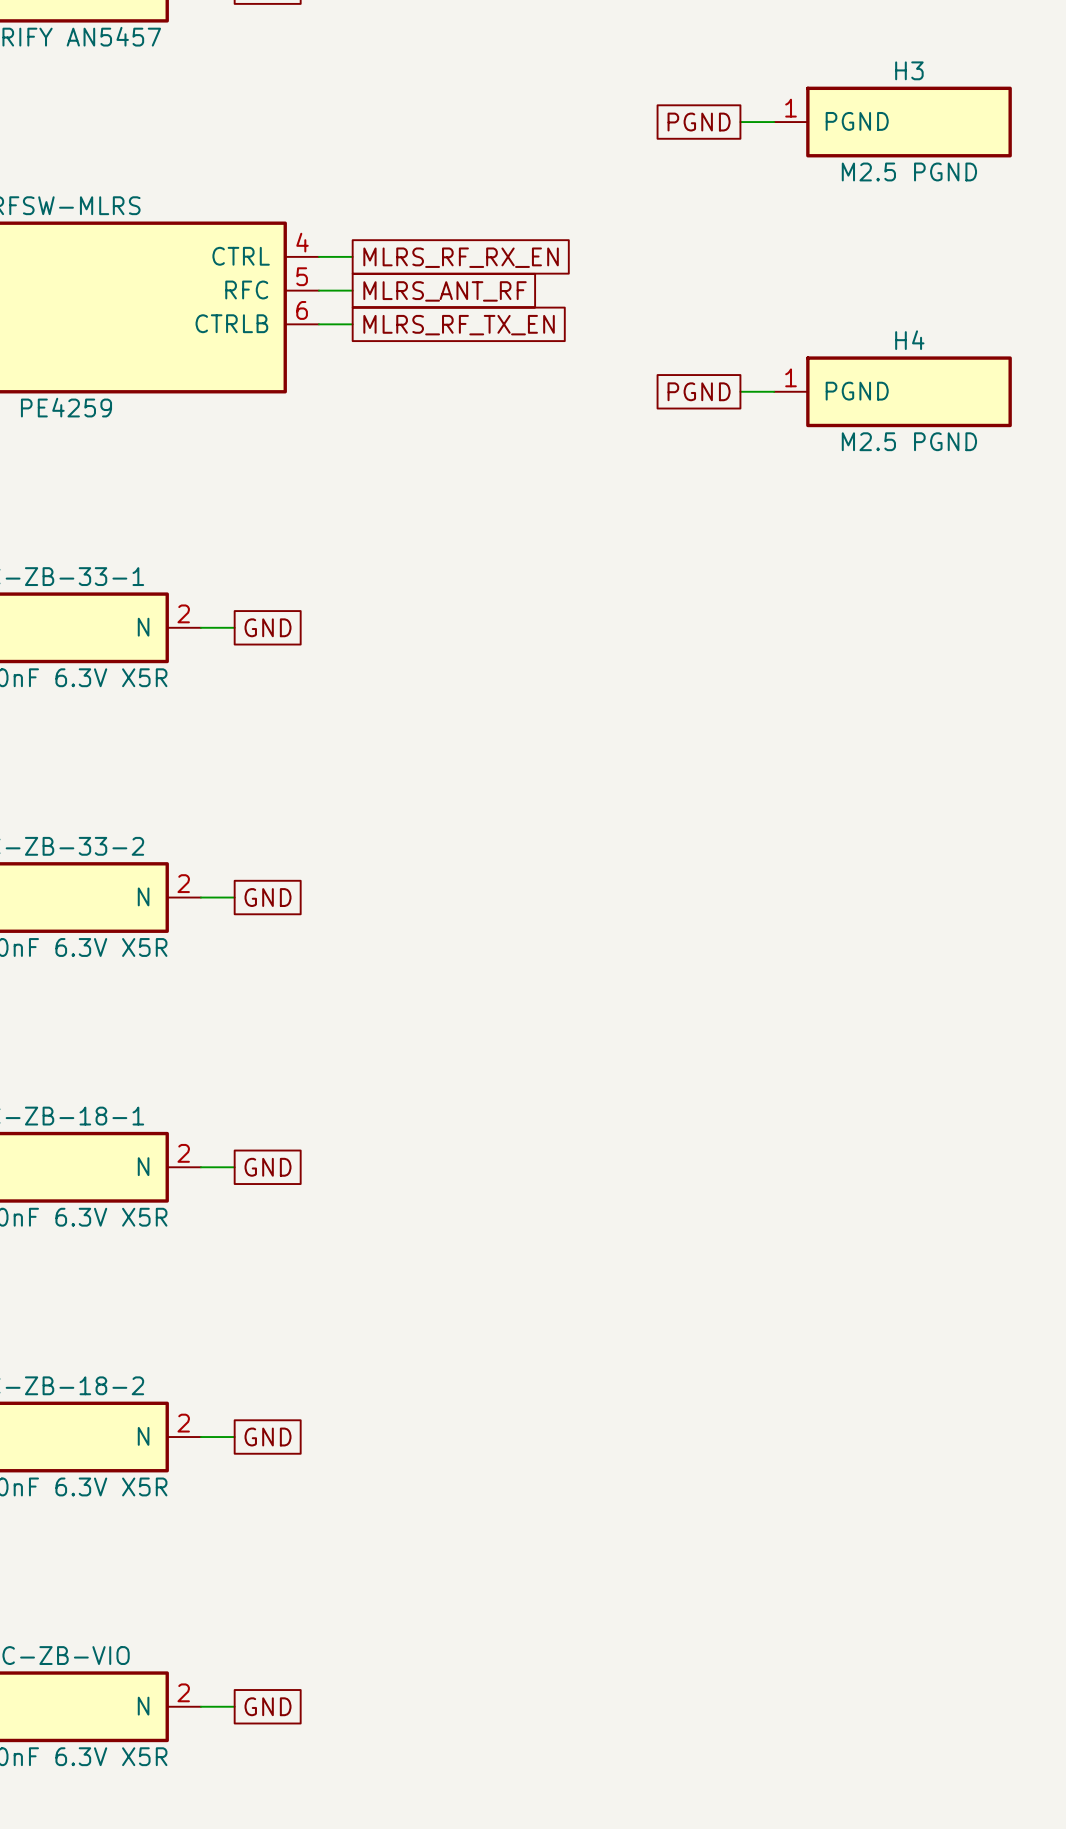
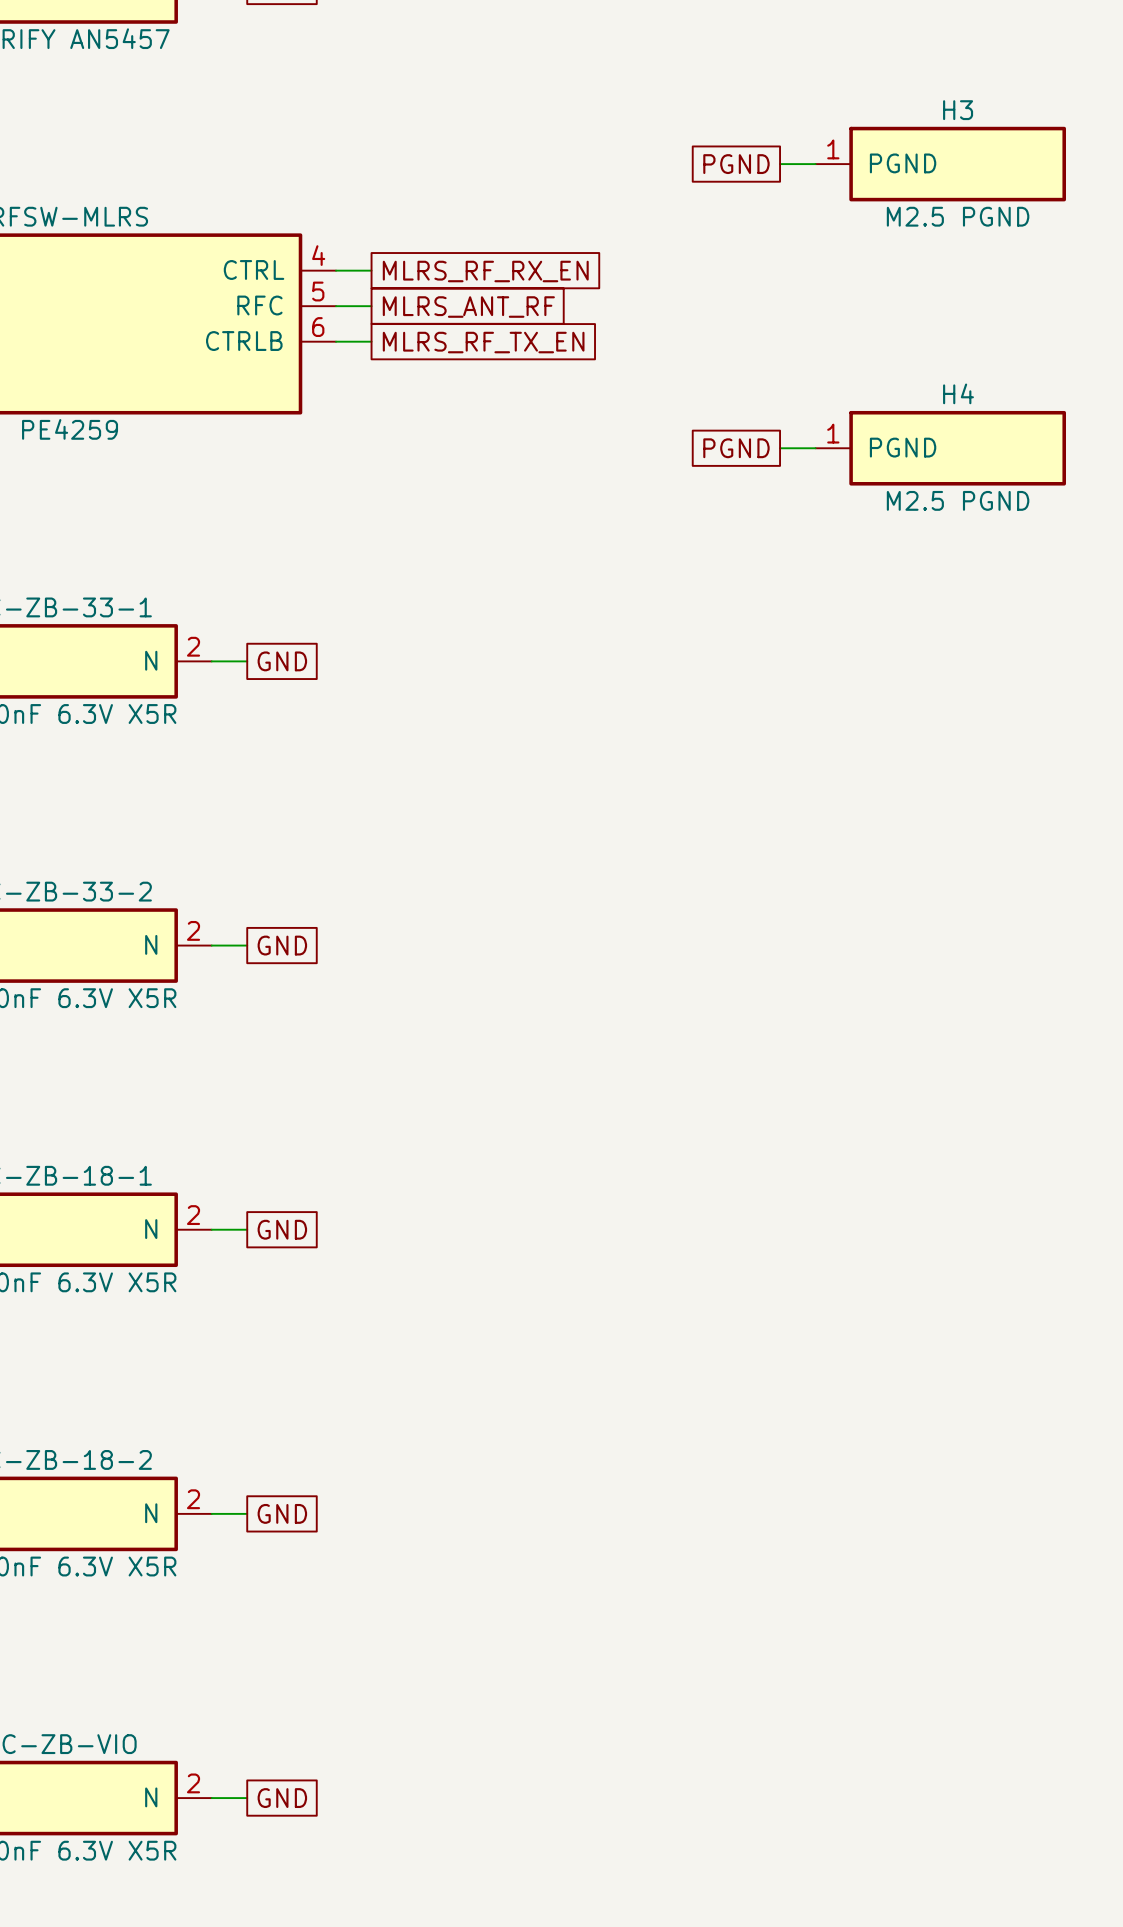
global label position: PGND (699, 122) -> PGND (736, 164)
wire: (740, 122) (774, 122) -> (780, 164) (815, 164)
H3 position: (892, 122) -> (940, 164)
global label position: PGND (699, 391) -> PGND (736, 448)
wire: (740, 391) (774, 391) -> (780, 448) (815, 448)
H4 position: (892, 391) -> (940, 448)

